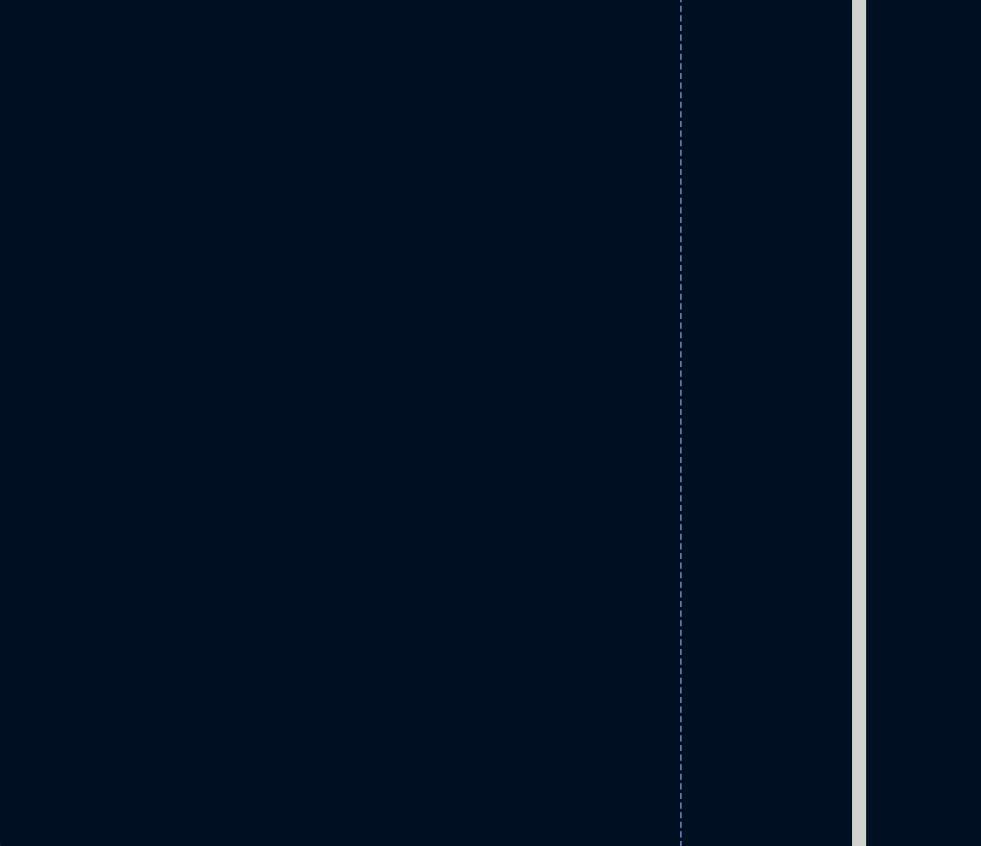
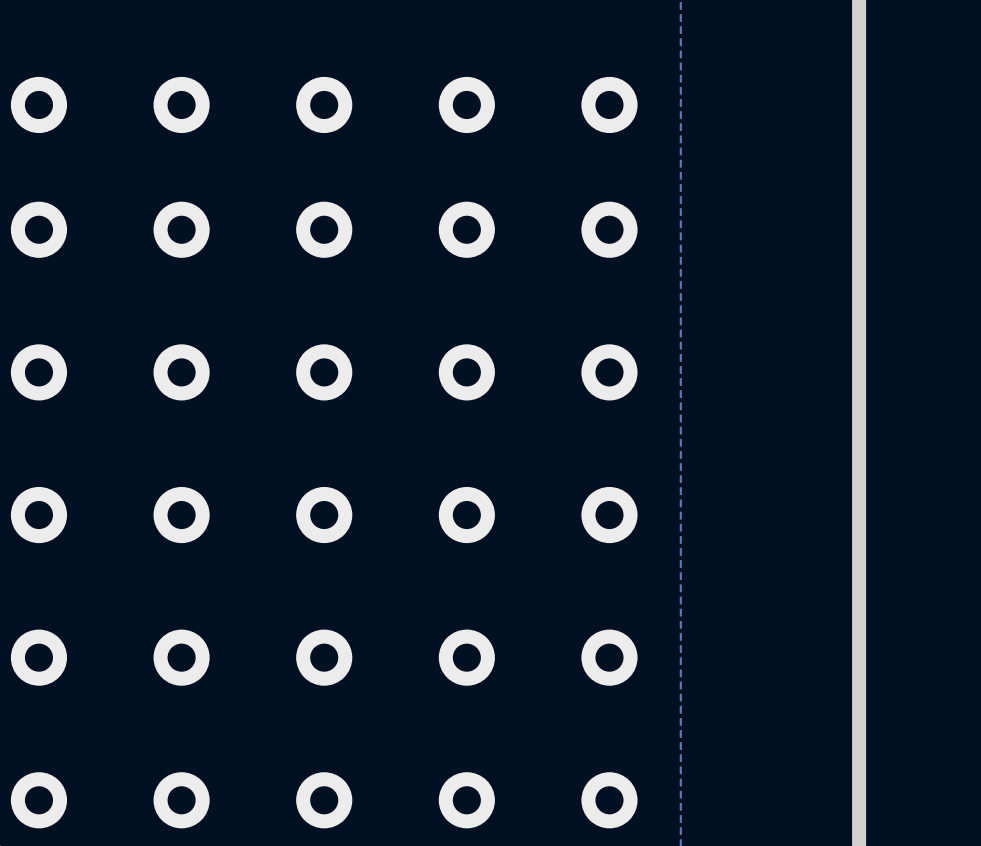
via: none -> (38, 104)
via: none -> (181, 104)
via: none -> (324, 104)
via: none -> (466, 104)
via: none -> (609, 104)
via: none -> (38, 229)
via: none -> (181, 229)
via: none -> (324, 229)
via: none -> (466, 229)
via: none -> (609, 229)
via: none -> (38, 372)
via: none -> (181, 372)
via: none -> (324, 372)
via: none -> (466, 372)
via: none -> (609, 372)
via: none -> (38, 515)
via: none -> (181, 515)
via: none -> (324, 515)
via: none -> (466, 515)
via: none -> (609, 515)
via: none -> (38, 657)
via: none -> (181, 657)
via: none -> (324, 657)
via: none -> (466, 657)
via: none -> (609, 657)
via: none -> (38, 800)
via: none -> (181, 800)
via: none -> (324, 800)
via: none -> (466, 800)
via: none -> (609, 800)

